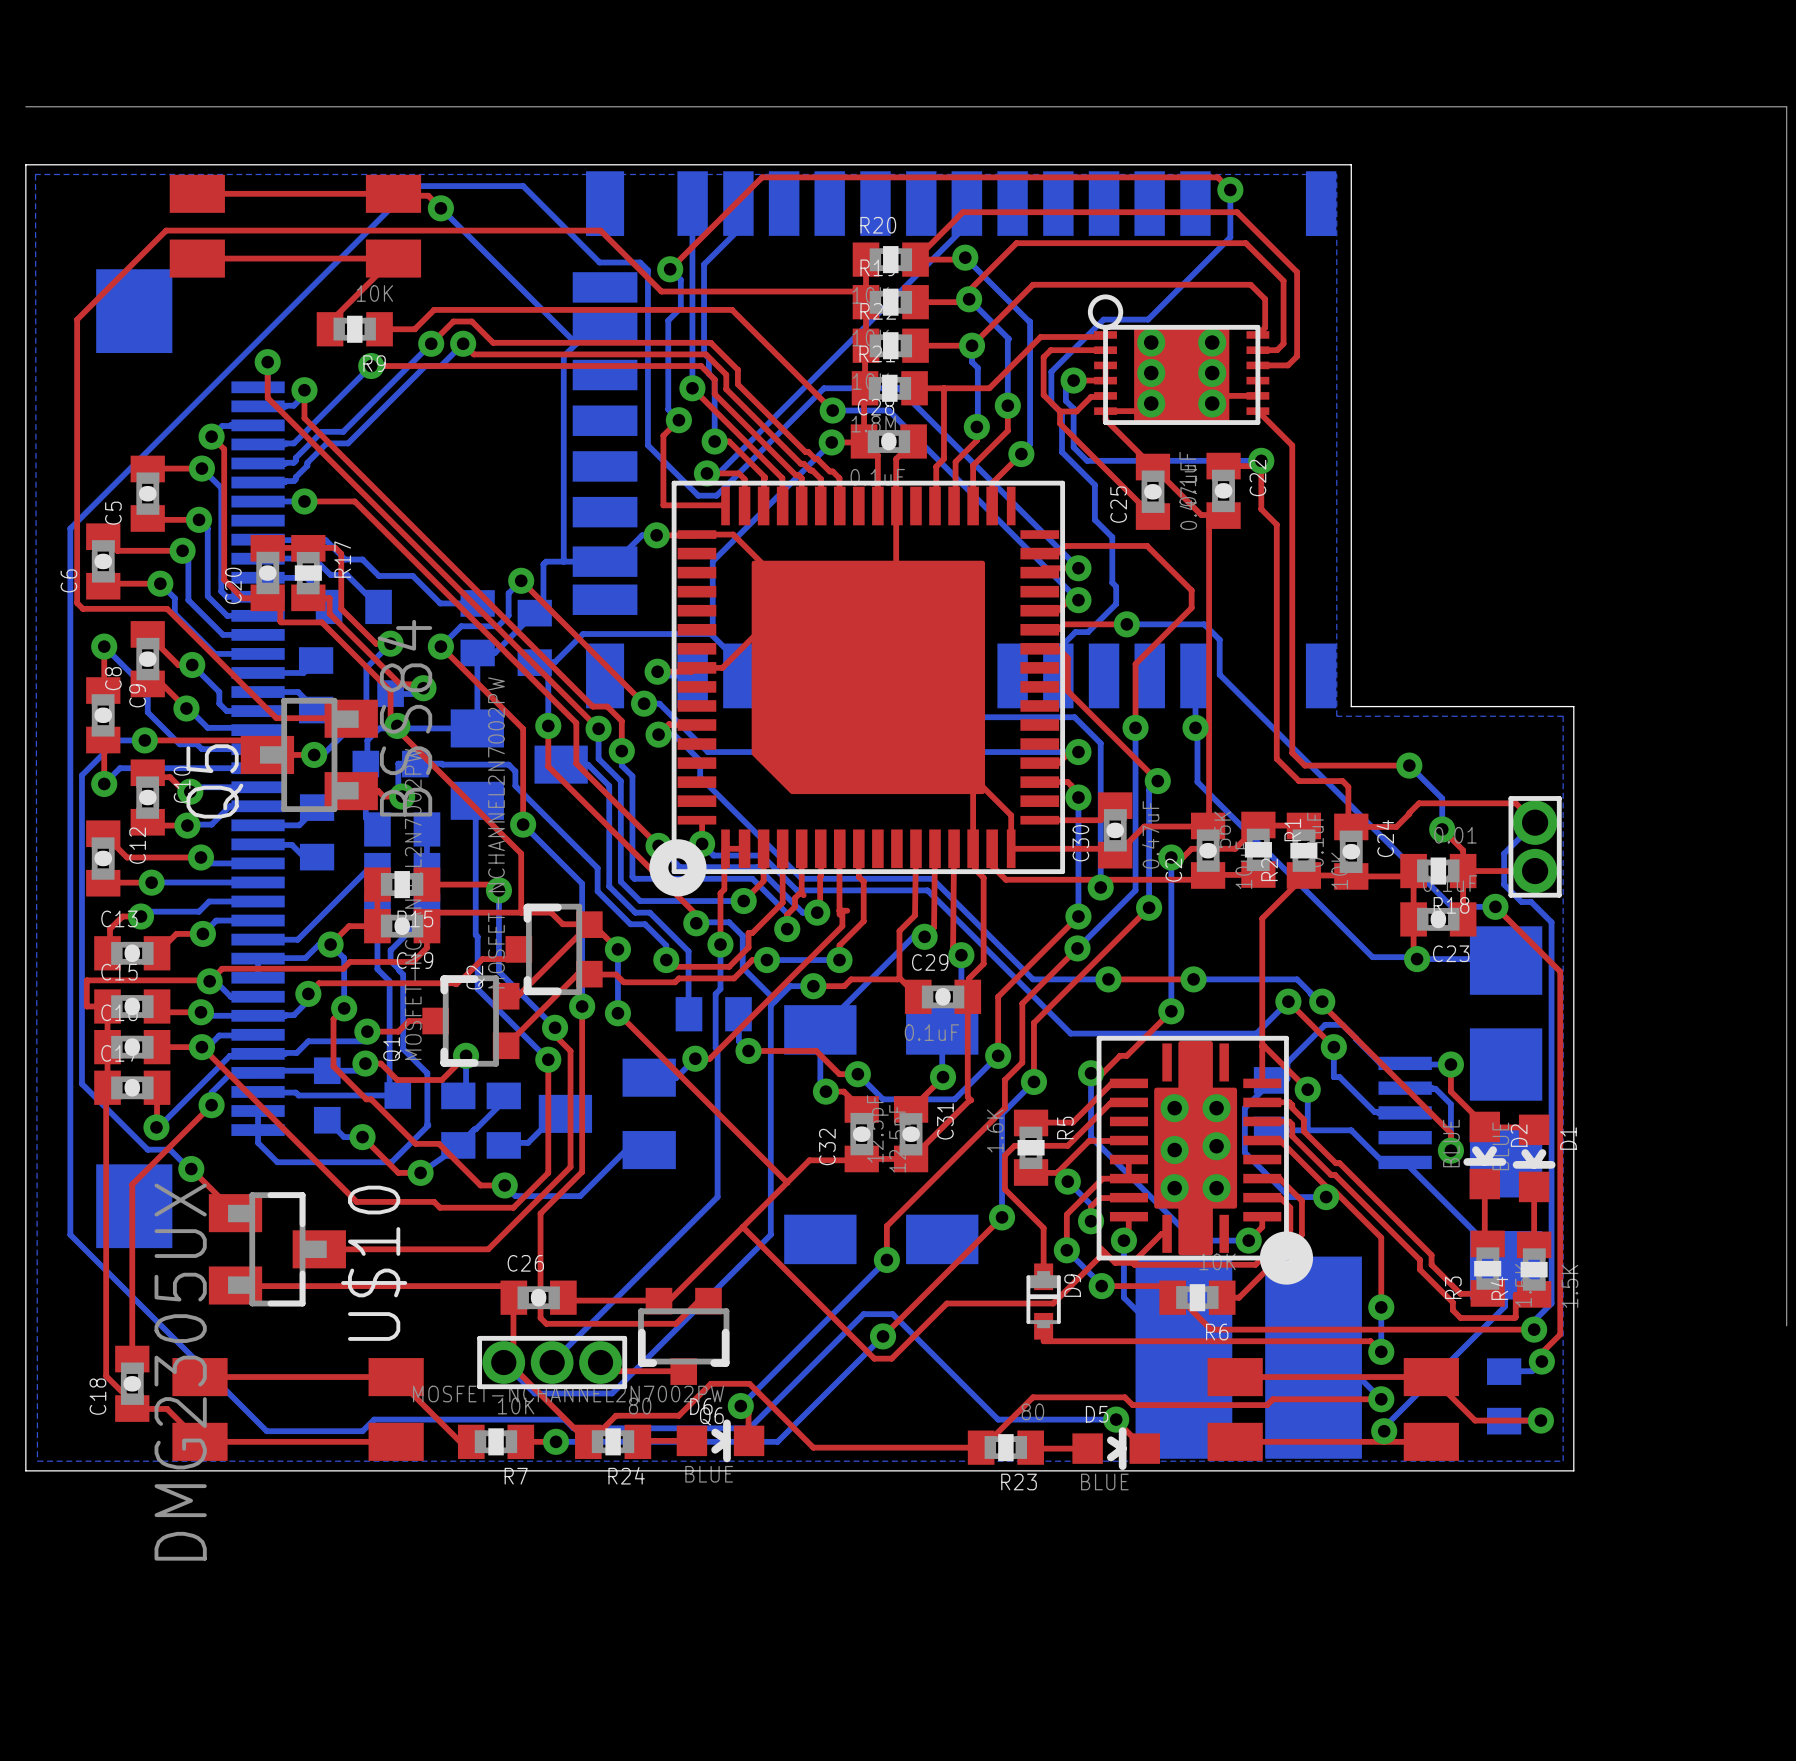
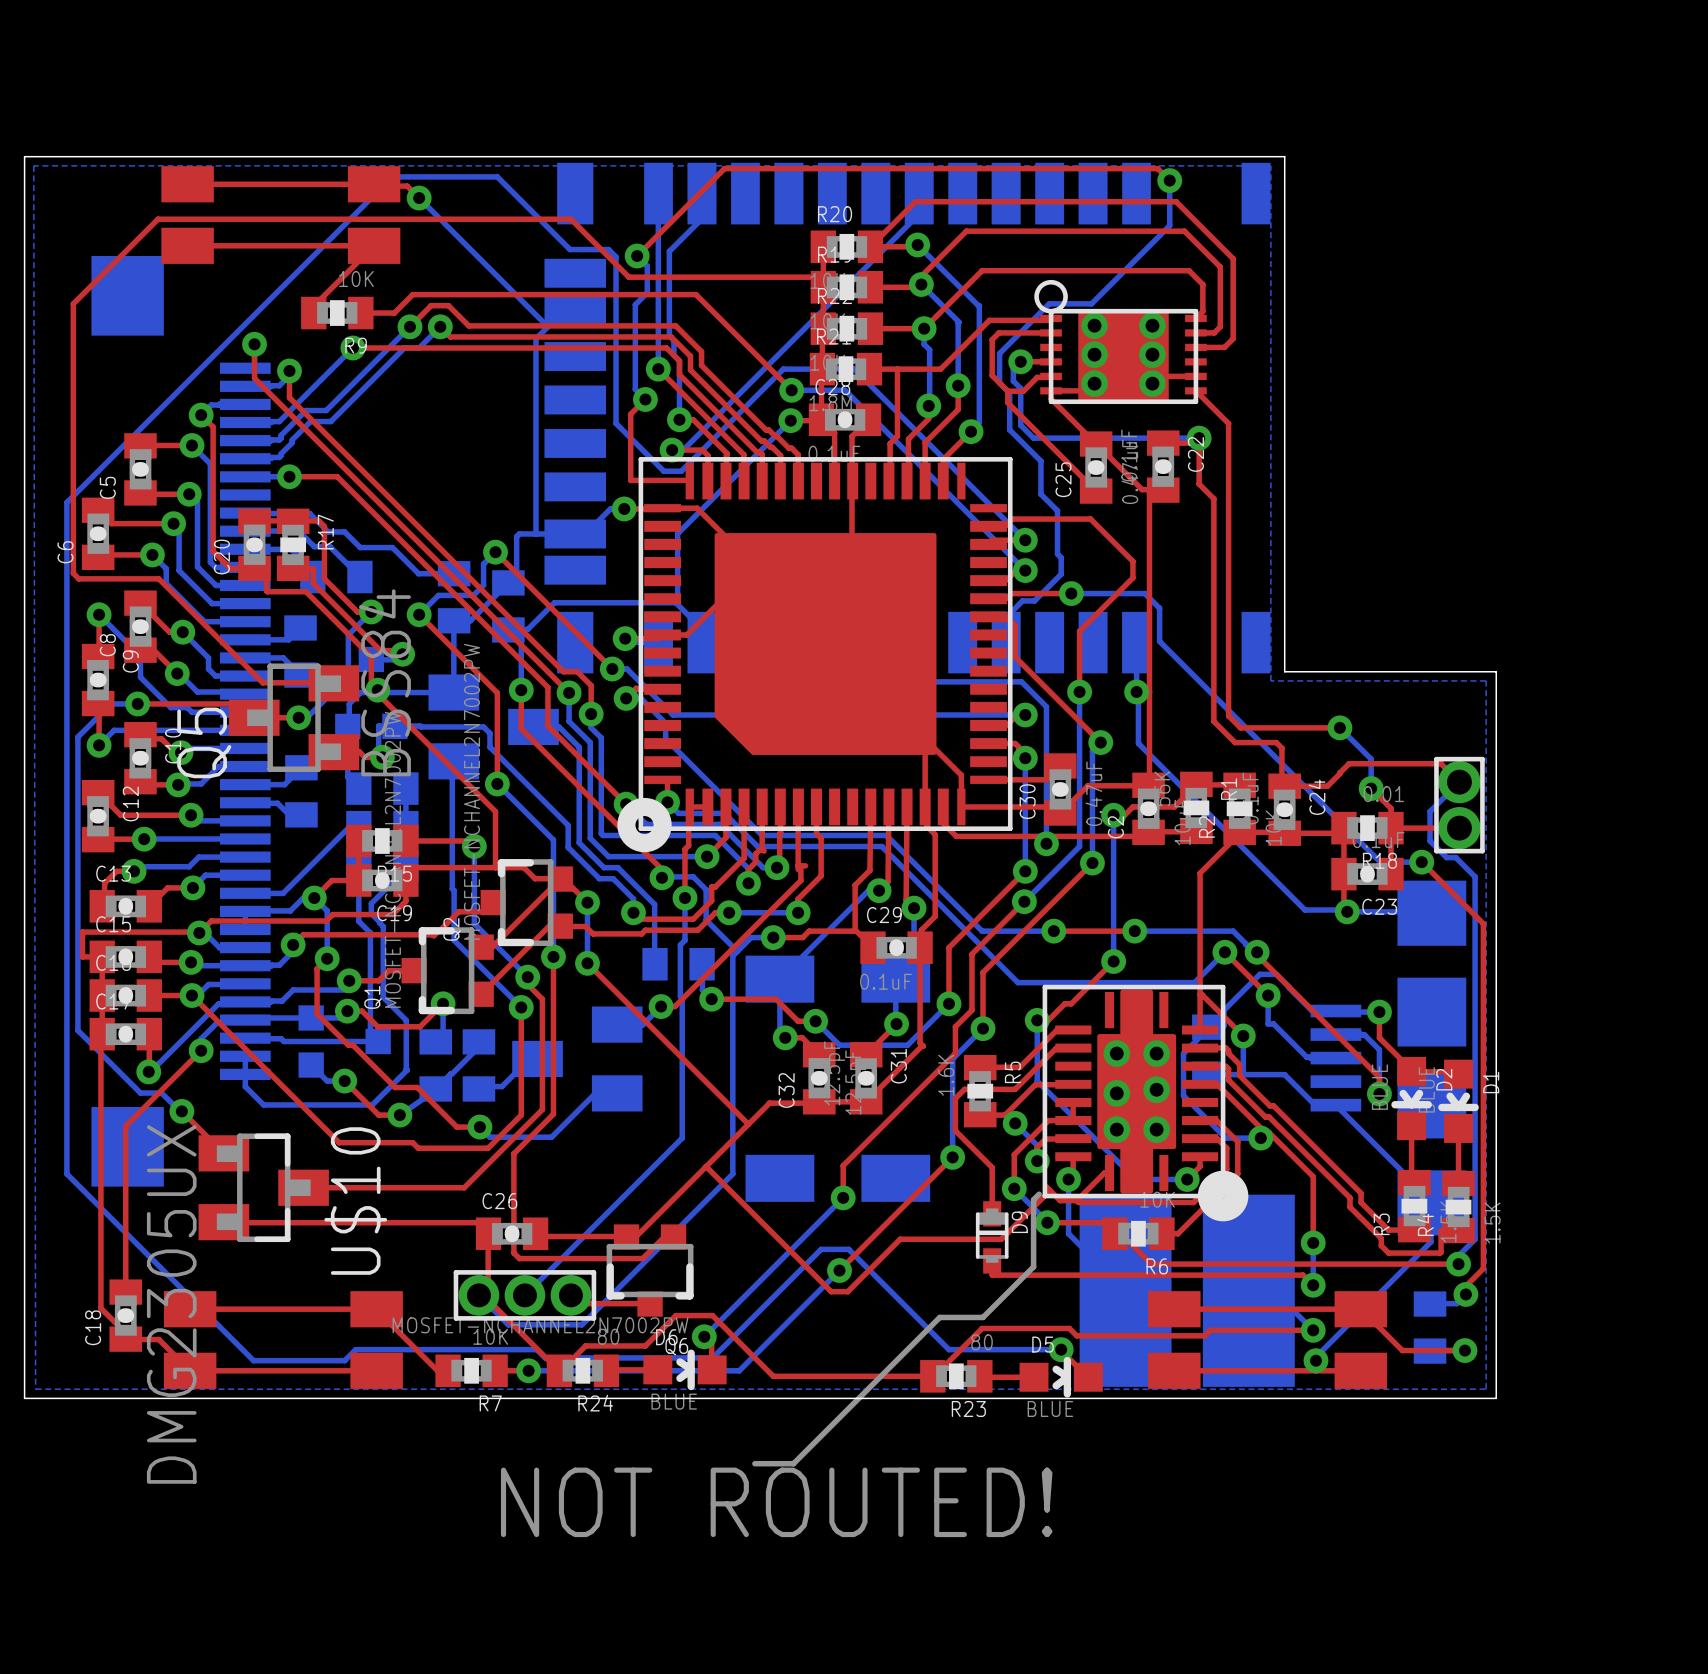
line: (25, 106) (1786, 106) (1786, 1325) -> none
line: none -> (1039, 1194) (1033, 1199) (1033, 1266) (983, 1317) (939, 1317) (793, 1463) (754, 1463)
text: none -> NOT ROUTED! (776, 1502)

